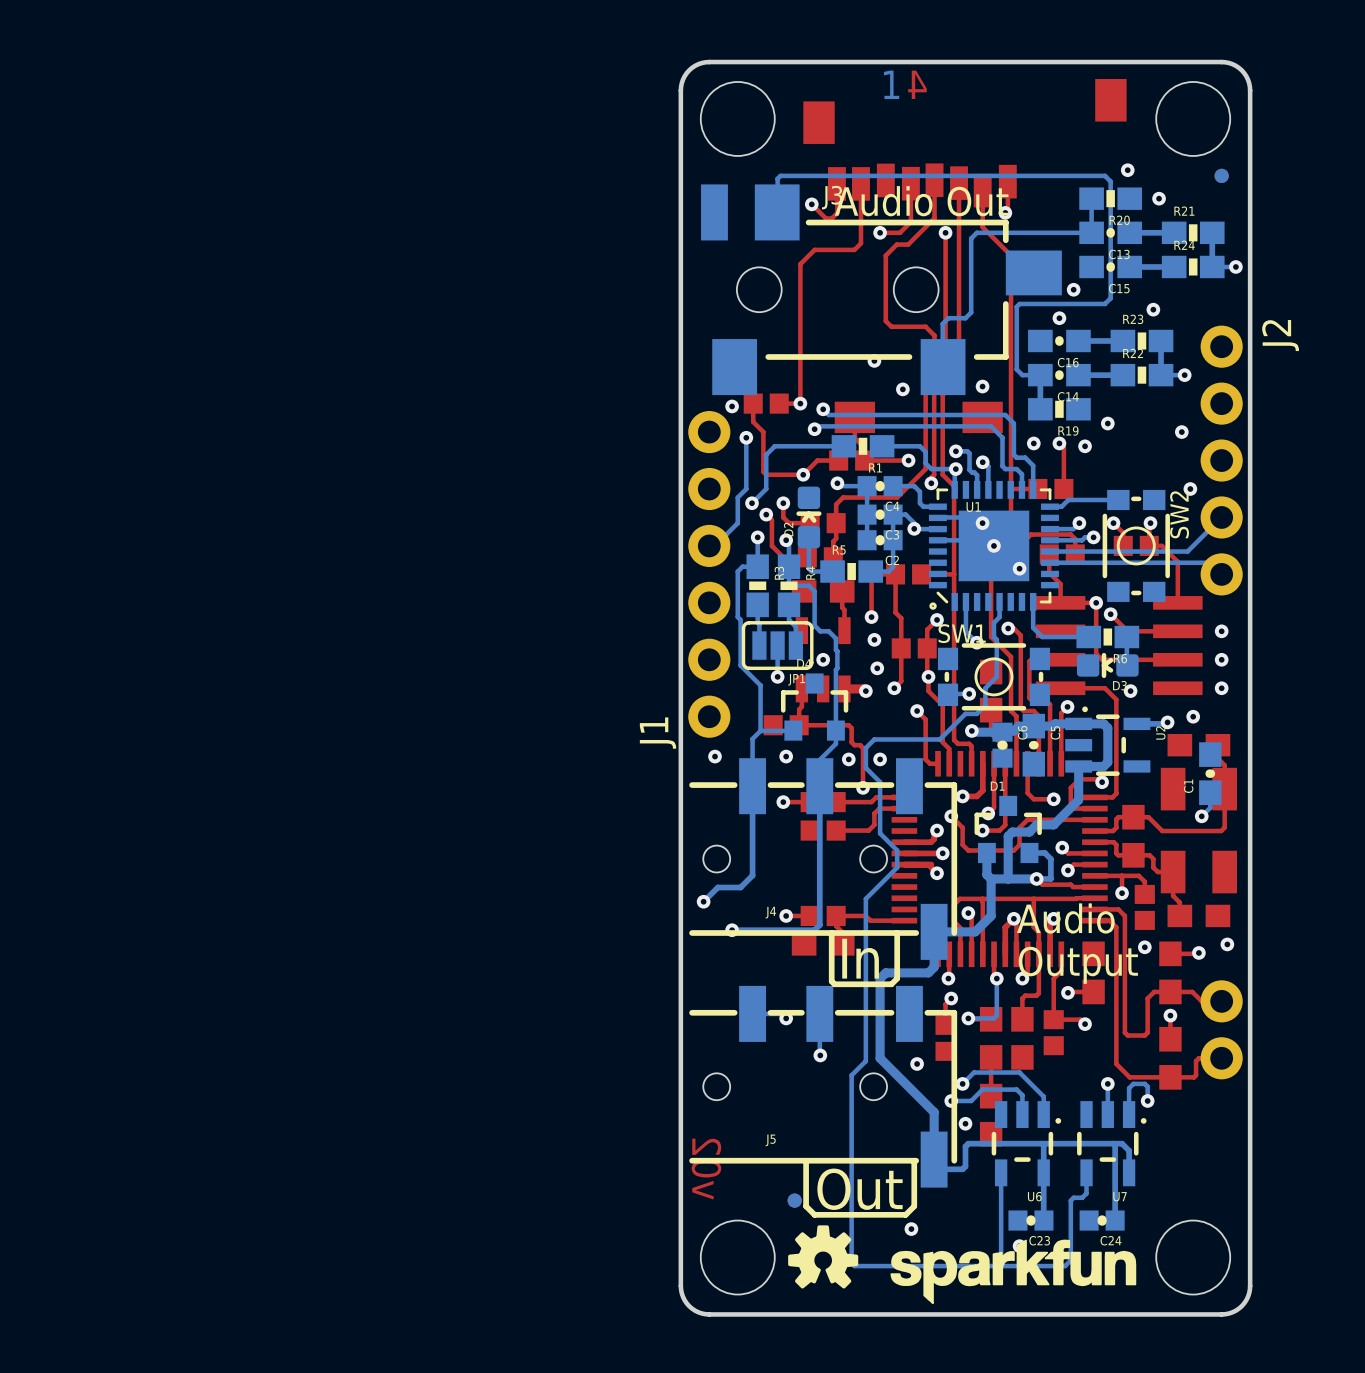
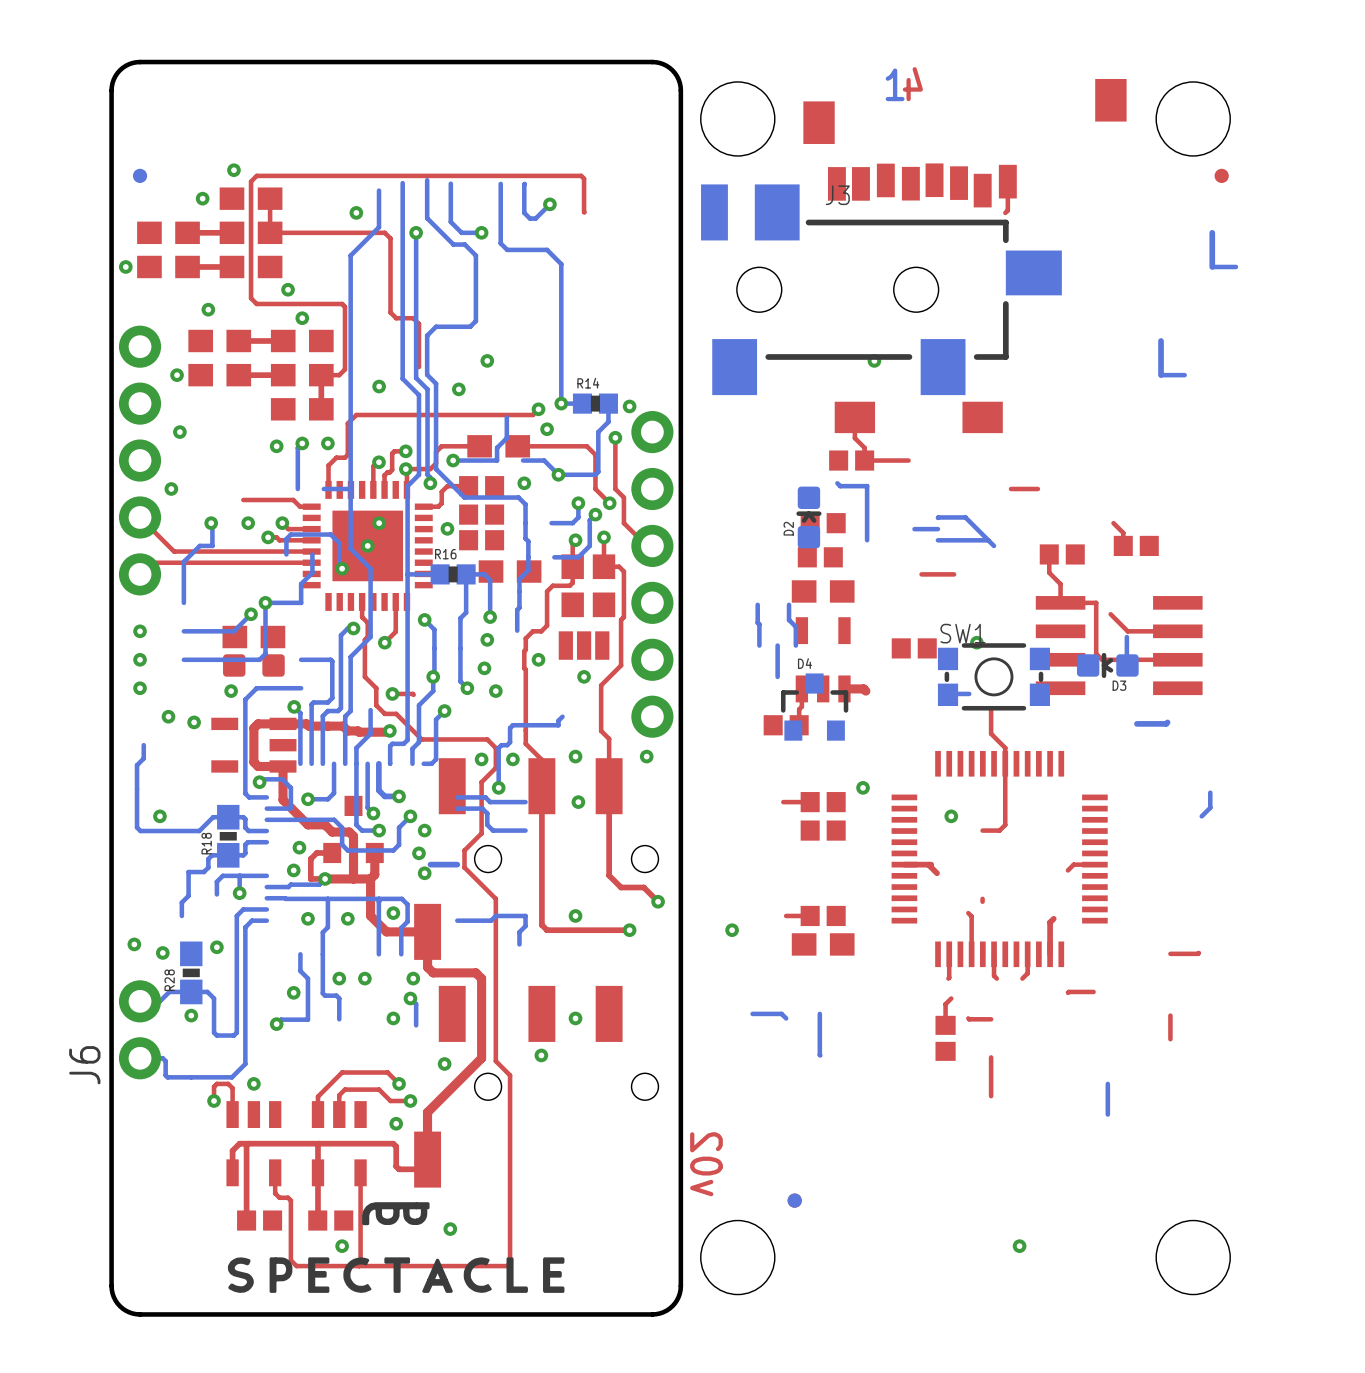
board edge: (680, 90) (683, 79) (689, 70) (698, 64) (709, 62) (1221, 62) (1232, 64) (1241, 70) (1247, 79) (1250, 90) (1250, 1286) (1247, 1296) (1235, 1310) (1221, 1314) (709, 1314) (698, 1312) (689, 1306) (683, 1296) (680, 1286) -> (680, 90) (678, 79) (672, 70) (663, 64) (652, 62) (140, 62) (129, 64) (119, 70) (113, 79) (111, 90) (111, 1286) (113, 1296) (125, 1310) (140, 1314) (652, 1314) (663, 1312) (672, 1306) (678, 1296) (680, 1286)
via: none -> (233, 170)
via: (1127, 170) -> none
part: none -> (140, 175)
part: (1221, 175) -> none
bottom track: none -> (427, 180) (427, 218) (453, 244) (464, 244) (475, 255) (475, 321) (470, 326) (436, 326) (427, 335) (427, 374) (436, 383) (436, 469) (464, 497) (518, 497) (525, 504) (528, 570) (519, 579) (517, 630)
top track: (934, 180) (934, 218) (908, 244) (896, 244) (885, 255) (885, 321) (891, 326) (925, 326) (934, 335) (934, 374) (925, 383) (925, 469) (897, 497) (843, 497) (836, 504) (833, 570) (842, 579) (844, 630) -> none
bottom track: none -> (402, 183) (402, 378) (418, 395) (418, 474) (407, 486) (407, 740) (403, 743) (392, 743) (390, 746) (390, 763)
bottom track: none -> (450, 183) (450, 221) (461, 232) (481, 232)
bottom track: none -> (500, 183) (500, 243) (507, 249) (547, 249) (561, 264) (561, 403) (582, 403)
bottom track: none -> (524, 183) (524, 212) (529, 218) (535, 218) (549, 204)
top track: (836, 183) (837, 212) (831, 218) (826, 218) (811, 204) -> none
top track: (860, 183) (860, 243) (854, 249) (814, 249) (800, 264) (800, 403) (779, 403) -> none
top track: (910, 183) (910, 221) (900, 232) (880, 232) -> none
top track: (959, 183) (959, 378) (942, 395) (942, 474) (954, 486) (954, 740) (957, 743) (969, 743) (971, 746) (971, 763) -> none
bottom track: none -> (379, 190) (379, 227) (350, 255) (350, 548) (370, 568) (370, 637) (350, 656) (350, 711) (345, 716) (345, 763)
top track: (982, 190) (982, 227) (1011, 255) (1011, 548) (991, 568) (991, 637) (1011, 656) (1011, 711) (1016, 716) (1016, 763) -> none
via: none -> (202, 198)
part: none -> (251, 198)
top track: none -> (270, 198) (270, 232) (384, 232) (390, 238) (390, 312) (396, 318) (413, 318) (418, 323) (418, 367)
bottom track: (1091, 198) (1091, 232) (976, 232) (971, 238) (971, 312) (965, 318) (948, 318) (942, 323) (943, 367) -> none
R20: (1110, 198) -> none
via: (1159, 198) -> none
text: Audio Out (921, 201) -> none
via: none -> (549, 204)
via: (811, 204) -> none
via: none -> (356, 212)
top track: none -> (584, 212) (584, 178) (581, 175) (256, 175) (251, 181) (251, 298) (256, 303) (342, 303) (344, 306) (344, 369) (339, 375) (321, 375) (321, 409)
bottom track: (777, 212) (777, 178) (780, 175) (1104, 175) (1110, 181) (1110, 298) (1104, 303) (1019, 303) (1016, 306) (1016, 369) (1022, 375) (1040, 375) (1040, 409) -> none
via: (1005, 212) -> none
part: none -> (168, 232)
top track: none -> (231, 232) (187, 232)
part: none -> (251, 232)
bottom track: none -> (416, 232) (416, 377) (427, 389) (427, 474) (430, 477) (430, 483)
via: none -> (416, 232)
via: none -> (481, 232)
via: (880, 232) -> none
top track: (945, 232) (945, 377) (934, 389) (934, 474) (931, 477) (931, 483) -> none
via: (945, 232) -> none
C13: (1110, 232) -> none
bottom track: (1174, 232) (1129, 232) -> none
R21: (1193, 232) -> none
via: none -> (125, 266)
part: none -> (168, 266)
top track: none -> (231, 266) (187, 266)
part: none -> (251, 266)
C15: (1110, 266) -> none
bottom track: (1174, 266) (1129, 266) -> none
R24: (1193, 266) -> none
via: (1235, 266) -> none
via: none -> (288, 289)
via: (1073, 289) -> none
via: none -> (208, 309)
via: (1153, 309) -> none
via: none -> (302, 318)
via: (1059, 318) -> none
part: none -> (219, 340)
top track: none -> (283, 340) (238, 340)
part: none -> (302, 340)
C16: (1059, 340) -> none
bottom track: (1122, 340) (1078, 340) -> none
R23: (1141, 340) -> none
via: none -> (487, 360)
via: none -> (177, 375)
part: none -> (219, 375)
top track: none -> (283, 375) (238, 375)
part: none -> (302, 375)
C14: (1059, 375) -> none
bottom track: (1122, 375) (1078, 375) -> none
R22: (1141, 375) -> none
via: (1184, 375) -> none
via: none -> (379, 386)
via: (982, 386) -> none
via: none -> (458, 389)
via: (902, 389) -> none
via: none -> (561, 403)
bottom track: none -> (608, 403) (608, 421) (598, 432) (598, 471) (595, 474) (558, 474) (544, 460) (523, 460)
top track: (753, 403) (753, 421) (763, 432) (763, 471) (766, 474) (803, 474) (817, 460) (838, 460) -> none
R14 side: top (766, 403) -> bottom (595, 403)
via: (800, 403) -> none
via: none -> (629, 406)
via: (732, 406) -> none
part: none -> (302, 409)
top track: none -> (538, 409) (532, 414) (356, 414) (347, 423) (347, 454) (344, 457) (336, 457) (328, 465) (328, 489)
via: none -> (538, 409)
bottom track: (823, 409) (828, 414) (1005, 414) (1013, 423) (1013, 454) (1016, 457) (1025, 457) (1033, 465) (1033, 489) -> none
via: (823, 409) -> none
R19: (1059, 409) -> none
bottom track: none -> (506, 417) (506, 438) (497, 447) (497, 460) (453, 460)
via: (1107, 423) -> none
via: none -> (547, 429)
bottom track: (814, 429) (814, 426) (991, 426) (1002, 437) (1002, 466) (1005, 469) (1016, 469) (1021, 474) (1021, 489) -> none
via: (814, 429) -> none
via: none -> (179, 432)
via: (1181, 432) -> none
top track: none -> (615, 437) (615, 489) (623, 497) (623, 523) (646, 545) (652, 545)
via: none -> (615, 437)
bottom track: (746, 437) (746, 489) (737, 497) (737, 523) (715, 545) (709, 545) -> none
via: (746, 437) -> none
bottom track: none -> (302, 443) (297, 447) (297, 489)
via: none -> (302, 443)
via: none -> (327, 443)
via: (1033, 443) -> none
top track: (1059, 443) (1063, 447) (1063, 489) -> none
via: (1059, 443) -> none
via: none -> (276, 446)
top track: none -> (479, 446) (441, 446) (436, 452) (436, 463) (430, 469) (405, 469) (406, 489)
top track: none -> (517, 446) (586, 446) (595, 454) (595, 489) (609, 503)
bottom track: (843, 446) (774, 446) (766, 454) (766, 489) (752, 503) -> none
R1 side: bottom (863, 446) -> top (498, 446)
bottom track: (882, 446) (919, 446) (925, 452) (925, 463) (931, 469) (955, 469) (954, 489) -> none
via: (1085, 446) -> none
top track: none -> (405, 451) (394, 451) (392, 453) (392, 469) (384, 475) (384, 489)
via: none -> (405, 451)
bottom track: (955, 451) (967, 451) (969, 453) (969, 469) (977, 475) (977, 489) -> none
via: (955, 451) -> none
part: none -> (140, 460)
via: none -> (453, 460)
via: (908, 460) -> none
J2: (1221, 460) -> none
top track: none -> (378, 462) (373, 466) (373, 489)
via: none -> (378, 462)
bottom track: (982, 462) (988, 466) (988, 489) -> none
via: (982, 462) -> none
via: none -> (405, 469)
via: (955, 469) -> none
via: none -> (558, 474)
via: (803, 474) -> none
via: none -> (430, 483)
via: none -> (524, 483)
via: (837, 483) -> none
via: (931, 483) -> none
top track: none -> (468, 486) (447, 486) (441, 491) (441, 503) (438, 506) (423, 506)
C4 side: bottom (880, 486) -> top (481, 486)
bottom track: (893, 486) (914, 486) (919, 491) (919, 503) (923, 506) (937, 506) -> none
via: none -> (171, 489)
bottom track: none -> (350, 489) (323, 489)
part: (1050, 489) -> none
via: (1190, 489) -> none
top track: none -> (243, 499) (293, 499) (300, 506) (311, 506)
bottom track: (1118, 499) (1068, 499) (1061, 506) (1049, 506) -> none
bottom track: none -> (578, 503) (578, 517) (572, 523) (551, 523)
via: none -> (578, 503)
via: none -> (609, 503)
via: (752, 503) -> none
top track: (783, 503) (783, 517) (789, 523) (810, 523) -> none
via: (783, 503) -> none
bottom track: none -> (595, 514) (589, 520) (589, 545) (578, 557) (554, 557)
via: none -> (595, 514)
top track: (766, 514) (771, 520) (771, 545) (783, 557) (807, 557) -> none
via: (766, 514) -> none
C3 side: bottom (880, 514) -> top (481, 514)
top track: none -> (140, 517) (174, 551) (311, 551)
bottom track: (1221, 517) (1187, 551) (1049, 551) -> none
bottom track: none -> (211, 523) (212, 545) (199, 545) (183, 561) (183, 602)
via: none -> (211, 523)
via: none -> (248, 523)
top track: none -> (282, 523) (288, 529) (311, 529)
via: none -> (282, 523)
via: none -> (379, 523)
via: (982, 523) -> none
bottom track: (1079, 523) (1073, 529) (1049, 529) -> none
via: (1079, 523) -> none
via: (1113, 523) -> none
top track: (1150, 523) (1149, 545) (1161, 545) (1177, 561) (1177, 602) -> none
via: (1150, 523) -> none
via: none -> (447, 528)
bottom track: (914, 528) (914, 523) (905, 514) (893, 514) (893, 567) (888, 571) (870, 571) -> none
via: (914, 528) -> none
top track: none -> (268, 537) (276, 537) (279, 540) (311, 540)
via: none -> (268, 537)
top track: none -> (604, 537) (604, 566) (619, 566) (623, 571) (621, 665) (601, 685) (601, 730) (609, 738) (609, 875) (621, 887) (643, 887) (658, 901)
via: none -> (604, 537)
bottom track: (757, 537) (757, 566) (742, 566) (737, 571) (737, 617) (740, 619) (740, 665) (760, 685) (760, 730) -> none
via: (757, 537) -> none
bottom track: (808, 537) (808, 568) (811, 571) (832, 571) -> none
bottom track: (1093, 537) (1085, 537) (1082, 540) (1049, 540) -> none
via: (1093, 537) -> none
top track: none -> (575, 540) (572, 543) (572, 582) (569, 585) (552, 585) (547, 591) (547, 625) (541, 631) (532, 631) (525, 638) (524, 651) (525, 743) (541, 759) (541, 925) (547, 930) (629, 930)
via: none -> (575, 540)
bottom track: (786, 540) (789, 543) (789, 582) (791, 585) (808, 585) (814, 591) (814, 625) (820, 631) (828, 631) (835, 638) (837, 651) (835, 743) (819, 759) (819, 925) (814, 930) (732, 930) -> none
via: (786, 540) -> none
C2 side: bottom (880, 540) -> top (481, 540)
part: none -> (367, 545)
via: none -> (367, 545)
U1: (993, 545) -> none
via: (993, 545) -> none
SW2: (1136, 545) -> none
bottom track: none -> (286, 554) (286, 539) (290, 534) (330, 534) (339, 543) (339, 565) (342, 568)
bottom track: none -> (312, 554) (312, 572) (301, 584) (301, 602) (265, 602) (265, 653) (259, 659) (183, 659)
top track: (1075, 554) (1075, 539) (1070, 534) (1030, 534) (1022, 543) (1022, 565) (1019, 568) -> none
top track: none -> (311, 562) (151, 562) (140, 574)
bottom track: (1049, 562) (1210, 562) (1221, 574) -> none
via: none -> (342, 568)
via: (1019, 568) -> none
R5 side: bottom (851, 571) -> top (510, 571)
bottom track: none -> (440, 574) (407, 574)
J1 position: (709, 574) -> (652, 574)
R16 side: top (908, 574) -> bottom (453, 574)
R3 side: bottom (757, 585) -> top (604, 585)
R4 side: bottom (789, 585) -> top (572, 585)
top track: none -> (362, 601) (362, 617) (367, 622) (367, 637) (364, 639) (364, 676) (376, 688) (376, 705) (384, 713) (396, 713) (421, 739) (487, 739) (495, 748) (495, 767) (481, 782) (481, 833) (464, 850) (464, 867) (495, 898) (495, 1061) (510, 1075) (510, 1263) (507, 1266) (296, 1266) (290, 1260) (290, 1200) (288, 1197) (279, 1197) (275, 1193) (275, 1172)
top track: none -> (395, 601) (395, 631) (384, 642)
bottom track: (965, 601) (965, 631) (976, 642) -> none
bottom track: (999, 601) (999, 617) (993, 622) (993, 637) (996, 639) (996, 676) (985, 688) (985, 705) (976, 713) (965, 713) (939, 739) (874, 739) (865, 748) (865, 767) (880, 782) (880, 833) (897, 850) (897, 867) (865, 898) (865, 1061) (851, 1075) (851, 1263) (854, 1266) (1065, 1266) (1070, 1260) (1070, 1200) (1073, 1197) (1082, 1197) (1086, 1193) (1086, 1172) -> none
bottom track: (1033, 601) (1033, 627) (1042, 637) (1088, 637) -> none
via: none -> (265, 602)
via: (1096, 602) -> none
bottom track: none -> (251, 614) (233, 631) (183, 631)
via: none -> (251, 614)
via: (1110, 614) -> none
bottom track: none -> (490, 617) (490, 580) (484, 574) (466, 574) (466, 612) (460, 618) (460, 681) (467, 688)
via: none -> (490, 617)
top track: (871, 617) (871, 580) (877, 574) (895, 574) (895, 612) (901, 618) (901, 681) (894, 688) -> none
via: (871, 617) -> none
bottom track: none -> (424, 619) (434, 629) (433, 691) (418, 705) (418, 742) (412, 748) (412, 763)
via: none -> (424, 619)
top track: (937, 619) (927, 629) (928, 691) (942, 705) (942, 742) (949, 748) (949, 763) -> none
via: (937, 619) -> none
bottom track: none -> (353, 628) (347, 628) (340, 635) (340, 708) (338, 711) (327, 711) (322, 716) (322, 763)
via: none -> (353, 628)
top track: (1008, 628) (1013, 628) (1020, 635) (1020, 708) (1023, 711) (1033, 711) (1038, 716) (1038, 763) -> none
via: (1008, 628) -> none
via: none -> (140, 631)
via: (1221, 631) -> none
part: none -> (253, 637)
R6: (1107, 637) -> none
via: none -> (487, 639)
via: (874, 639) -> none
via: none -> (384, 642)
JP1 side: bottom (777, 645) -> top (584, 645)
via: none -> (140, 659)
bottom track: none -> (301, 659) (332, 661) (332, 698) (327, 702) (313, 702) (311, 704) (311, 763)
via: none -> (538, 659)
via: (823, 659) -> none
top track: (1060, 659) (1029, 661) (1029, 698) (1033, 702) (1048, 702) (1050, 704) (1050, 763) -> none
via: (1221, 659) -> none
part: none -> (253, 665)
via: none -> (484, 668)
via: (877, 668) -> none
via: none -> (433, 676)
via: none -> (584, 676)
via: (777, 676) -> none
via: (928, 676) -> none
via: none -> (140, 688)
bottom track: none -> (301, 688) (256, 688) (245, 699) (245, 793) (249, 797) (266, 797)
via: none -> (467, 688)
via: (894, 688) -> none
top track: (1060, 688) (1104, 688) (1116, 699) (1116, 793) (1112, 797) (1094, 797) -> none
via: (1221, 688) -> none
via: none -> (231, 691)
via: none -> (495, 691)
via: (865, 691) -> none
part: (991, 691) -> none
via: (1130, 691) -> none
top track: none -> (392, 693) (413, 694)
via: none -> (392, 693)
via: (969, 693) -> none
bottom track: none -> (294, 706) (300, 713) (300, 763)
via: none -> (294, 706)
top track: (1067, 706) (1061, 713) (1061, 763) -> none
via: (1067, 706) -> none
bottom track: none -> (370, 710) (370, 733) (356, 747) (356, 824) (362, 830) (379, 830)
bottom track: none -> (444, 711) (436, 719) (436, 759) (431, 763) (423, 763)
via: none -> (444, 711)
top track: (917, 711) (925, 719) (925, 759) (930, 763) (938, 763) -> none
via: (917, 711) -> none
via: none -> (168, 716)
bottom track: none -> (562, 716) (558, 720) (558, 725) (512, 725) (510, 728) (510, 742) (498, 748) (498, 787)
top track: (799, 716) (803, 720) (803, 725) (848, 725) (851, 728) (851, 742) (863, 748) (863, 787) -> none
via: (1193, 716) -> none
via: none -> (194, 722)
via: (1167, 722) -> none
top track: none -> (389, 730) (359, 732) (347, 730) (343, 726) (308, 726) (306, 723) (258, 723) (253, 728) (253, 762) (258, 766) (283, 766) (283, 799) (307, 824) (325, 824) (332, 832) (349, 832) (353, 836) (353, 878)
via: none -> (389, 730)
bottom track: (760, 730) (752, 738) (752, 875) (740, 887) (717, 887) (703, 901) -> none
bottom track: (793, 730) (760, 730) -> none
bottom track: (971, 730) (1002, 732) (1013, 730) (1018, 726) (1052, 726) (1055, 723) (1103, 723) (1107, 728) (1107, 762) (1103, 766) (1078, 766) (1078, 799) (1053, 824) (1036, 824) (1029, 832) (1012, 832) (1008, 836) (1008, 878) -> none
via: (971, 730) -> none
U2: (1107, 741) -> none
bottom track: none -> (143, 745) (143, 758) (137, 765) (137, 827) (140, 831) (199, 831) (213, 817) (243, 817) (245, 819) (245, 827) (248, 831) (266, 831)
part: none -> (253, 745)
C6: (1002, 745) -> none
C5: (1033, 745) -> none
part: (1198, 745) -> none
top track: (1217, 745) (1217, 758) (1224, 765) (1224, 827) (1221, 831) (1162, 831) (1148, 817) (1118, 817) (1116, 819) (1116, 827) (1113, 831) (1094, 831) -> none
via: none -> (575, 756)
via position: (715, 756) -> (646, 756)
via: (786, 756) -> none
via: none -> (481, 759)
via: none -> (512, 759)
via: (848, 759) -> none
via: (880, 759) -> none
bottom track: none -> (334, 763) (334, 793) (327, 799) (307, 799)
bottom track: none -> (367, 763) (367, 807) (373, 813)
bottom track: none -> (378, 763) (378, 790) (384, 796) (399, 796)
top track: (982, 763) (982, 790) (976, 796) (962, 796) -> none
top track: (994, 763) (994, 807) (988, 813) -> none
top track: (1027, 763) (1027, 793) (1033, 799) (1053, 799) -> none
C1: (1210, 773) -> none
bottom track: none -> (259, 782) (262, 779) (282, 779) (290, 787) (290, 808) (266, 808)
via: none -> (259, 782)
top track: (1102, 782) (1099, 779) (1079, 779) (1070, 787) (1071, 808) (1094, 808) -> none
via: (1102, 782) -> none
via: none -> (498, 787)
via: none -> (399, 796)
via: (962, 796) -> none
bottom track: none -> (457, 797) (485, 797) (490, 802) (525, 802)
top track: (904, 797) (876, 797) (871, 802) (836, 802) -> none
via: none -> (307, 799)
via: (1053, 799) -> none
via: none -> (578, 802)
via: (783, 802) -> none
bottom track: none -> (457, 808) (482, 808) (487, 813) (487, 824) (492, 830) (525, 830)
top track: (904, 808) (879, 808) (874, 813) (874, 824) (868, 830) (836, 830) -> none
via: none -> (373, 813)
via: (988, 813) -> none
via: none -> (159, 816)
bottom track: none -> (410, 816) (399, 827) (399, 844) (393, 850) (347, 850) (342, 844) (342, 827) (334, 819) (266, 819)
via: none -> (410, 816)
top track: (951, 816) (962, 827) (962, 844) (968, 850) (1013, 850) (1019, 844) (1019, 827) (1027, 819) (1094, 819) -> none
via: (1201, 816) -> none
part: none -> (353, 829)
D1: (1008, 829) -> none
via: none -> (379, 830)
via: none -> (424, 830)
top track: (937, 830) (931, 842) (904, 842) -> none
via: (937, 830) -> none
via: (982, 830) -> none
part: (1198, 830) -> none
R18: none -> (228, 836)
part: (1133, 836) -> none
bottom track: none -> (266, 842) (247, 842) (245, 844) (245, 853) (243, 855) (212, 855) (208, 859) (208, 867) (203, 872) (188, 872) (188, 895) (181, 902) (181, 915)
top track: (1094, 842) (1113, 842) (1116, 844) (1116, 853) (1118, 855) (1149, 855) (1153, 859) (1153, 867) (1157, 872) (1173, 872) (1173, 895) (1179, 902) (1179, 915) -> none
via: none -> (299, 847)
top track: (1062, 847) (1068, 853) (1094, 853) -> none
via: (1062, 847) -> none
top track: none -> (332, 852) (316, 852) (310, 859) (310, 878) (370, 878)
top track: none -> (374, 852) (374, 874) (370, 878)
bottom track: (986, 852) (986, 874) (991, 878) -> none
bottom track: (1029, 852) (1044, 852) (1050, 859) (1050, 878) (991, 878) -> none
via: none -> (418, 853)
top track: (942, 853) (904, 853) -> none
via: (942, 853) -> none
J4 side: bottom (823, 859) -> top (536, 859)
bottom track: none -> (457, 864) (430, 864)
via: none -> (293, 870)
via: (1067, 870) -> none
via: none -> (424, 873)
via: (937, 873) -> none
bottom track: none -> (239, 875) (239, 893)
bottom track: none -> (266, 875) (222, 875) (216, 881) (216, 894)
top track: (1094, 875) (1138, 875) (1144, 881) (1144, 894) -> none
top track: (1122, 875) (1122, 893) -> none
bottom track: none -> (325, 878) (319, 884) (266, 887)
via: none -> (325, 878)
top track: none -> (370, 878) (370, 915) (386, 931) (427, 931) (427, 967) (433, 972) (475, 972) (481, 978) (481, 1058) (427, 1112) (427, 1163) (421, 1169)
bottom track: (991, 878) (991, 915) (975, 931) (934, 931) (934, 967) (928, 972) (885, 972) (880, 978) (880, 1058) (934, 1112) (934, 1163) (939, 1169) -> none
top track: (1036, 878) (1042, 884) (1094, 887) -> none
via: (1036, 878) -> none
via: none -> (239, 893)
via: (1122, 893) -> none
bottom track: none -> (266, 898) (401, 898) (407, 904) (407, 921) (401, 927) (401, 954)
bottom track: none -> (327, 898) (327, 927) (322, 932) (322, 993) (325, 995) (336, 995) (339, 998) (339, 1019)
top track: (1033, 898) (1033, 927) (1038, 932) (1038, 993) (1036, 995) (1025, 995) (1022, 998) (1022, 1019) -> none
top track: (1094, 898) (959, 898) (954, 904) (954, 921) (960, 927) (960, 954) -> none
via: none -> (658, 901)
via: (703, 901) -> none
bottom track: none -> (378, 902) (378, 954)
top track: (982, 902) (982, 954) -> none
part: (1144, 907) -> none
bottom track: none -> (266, 909) (243, 909) (236, 915) (236, 1032) (233, 1035) (216, 1035) (214, 1032) (214, 998) (207, 991) (169, 991) (159, 1001) (140, 1001)
top track: (1094, 909) (1118, 909) (1124, 915) (1124, 1032) (1127, 1035) (1144, 1035) (1147, 1032) (1147, 998) (1154, 991) (1192, 991) (1201, 1001) (1221, 1001) -> none
via: none -> (393, 913)
via: (968, 913) -> none
via: none -> (575, 915)
via: (786, 915) -> none
part: (1198, 915) -> none
via: none -> (307, 918)
via: none -> (347, 918)
via: (1013, 918) -> none
via: (1053, 918) -> none
text: Audio (1065, 918) -> none
bottom track: none -> (266, 920) (252, 920) (245, 927) (245, 1063) (231, 1077) (167, 1077) (165, 1075) (165, 1061) (162, 1058) (140, 1058)
bottom track: none -> (457, 920) (491, 920) (495, 915) (525, 915) (525, 926) (519, 932) (519, 944)
top track: (904, 920) (870, 920) (865, 915) (836, 915) (836, 926) (842, 932) (842, 944) -> none
top track: (1094, 920) (1109, 920) (1116, 927) (1116, 1063) (1129, 1077) (1194, 1077) (1196, 1075) (1196, 1061) (1198, 1058) (1221, 1058) -> none
via: none -> (629, 930)
line: (897, 933) (897, 978) (891, 984) (834, 984) (831, 981) (831, 933) -> none
via: none -> (134, 944)
via: (1227, 944) -> none
via: none -> (216, 947)
via: (1144, 947) -> none
via: none -> (162, 952)
via: (1198, 952) -> none
bottom track: none -> (300, 954) (300, 971) (307, 978) (307, 1019) (281, 1019) (276, 1024)
top track: (1016, 954) (1016, 921) (1013, 918) (1005, 927) (1005, 954) -> none
top track: (1061, 954) (1061, 971) (1053, 978) (1053, 1019) (1080, 1019) (1085, 1024) -> none
text: In (860, 958) -> none
text: Output (1078, 965) -> none
R28: none -> (191, 972)
part: (1093, 972) -> none
part: (1170, 972) -> none
via: none -> (339, 978)
via: none -> (364, 978)
via: none -> (413, 978)
via: (948, 978) -> none
bottom track: (996, 978) (996, 1015) (993, 1018) (968, 1018) -> none
via: (996, 978) -> none
via: (1022, 978) -> none
via: none -> (293, 992)
via: (1067, 992) -> none
bottom track: none -> (410, 998) (416, 1004) (416, 1025)
via: none -> (410, 998)
via: (951, 998) -> none
via: none -> (191, 1015)
via: (1170, 1015) -> none
via: none -> (393, 1018)
via: none -> (575, 1018)
via: (786, 1018) -> none
via: (968, 1018) -> none
via: none -> (276, 1024)
via: (1085, 1024) -> none
J6: none -> (140, 1029)
part: (1221, 1029) -> none
part: (1053, 1032) -> none
part: (991, 1038) -> none
part: (1022, 1038) -> none
via: none -> (541, 1055)
via: (820, 1055) -> none
part: (1170, 1058) -> none
via: none -> (444, 1063)
via: (917, 1063) -> none
via: none -> (253, 1083)
top track: none -> (399, 1083) (387, 1072) (342, 1072) (317, 1096) (317, 1114)
via: none -> (399, 1083)
bottom track: (962, 1083) (974, 1072) (1019, 1072) (1043, 1096) (1043, 1114) -> none
via: (962, 1083) -> none
via: (1107, 1083) -> none
J5 side: bottom (823, 1086) -> top (536, 1086)
top track: none -> (214, 1100) (214, 1086) (216, 1083) (228, 1083) (232, 1088) (232, 1114)
via: none -> (214, 1100)
top track: none -> (410, 1100) (390, 1100) (379, 1089) (344, 1089) (339, 1095) (339, 1114)
via: none -> (410, 1100)
bottom track: (951, 1100) (971, 1100) (982, 1089) (1016, 1089) (1022, 1095) (1022, 1114) -> none
via: (951, 1100) -> none
bottom track: (1147, 1100) (1147, 1086) (1144, 1083) (1133, 1083) (1129, 1088) (1129, 1114) -> none
via: (1147, 1100) -> none
part: (991, 1115) -> none
via: none -> (396, 1123)
via: (965, 1123) -> none
top track: none -> (248, 1143) (246, 1145) (246, 1220)
part: none -> (253, 1143)
top track: none -> (319, 1143) (317, 1220)
part: none -> (339, 1143)
U6: (1026, 1143) -> none
bottom track: (1042, 1143) (1043, 1220) -> none
U7: (1111, 1143) -> none
bottom track: (1113, 1143) (1115, 1145) (1115, 1220) -> none
line: (914, 1160) (914, 1206) (905, 1214) (814, 1214) (806, 1206) (806, 1160) -> none
top track: none -> (421, 1169) (399, 1169) (396, 1166) (396, 1146) (393, 1143) (239, 1143) (232, 1150) (232, 1172)
bottom track: (939, 1169) (962, 1169) (965, 1166) (965, 1146) (968, 1143) (1122, 1143) (1129, 1150) (1129, 1172) -> none
top track: none -> (360, 1172) (359, 1266)
bottom track: (1001, 1172) (1002, 1266) -> none
text: Out (860, 1189) -> none
drawing: none -> [362, 1202, 430, 1226]
part: none -> (259, 1220)
part: none -> (330, 1220)
C23: (1030, 1220) -> none
C24: (1102, 1220) -> none
drawing: [788, 1225, 859, 1289] -> none
via: none -> (450, 1229)
via: (911, 1229) -> none
drawing: [890, 1239, 1137, 1305] -> none
via: none -> (342, 1246)
drawing: none -> [227, 1257, 565, 1293]

